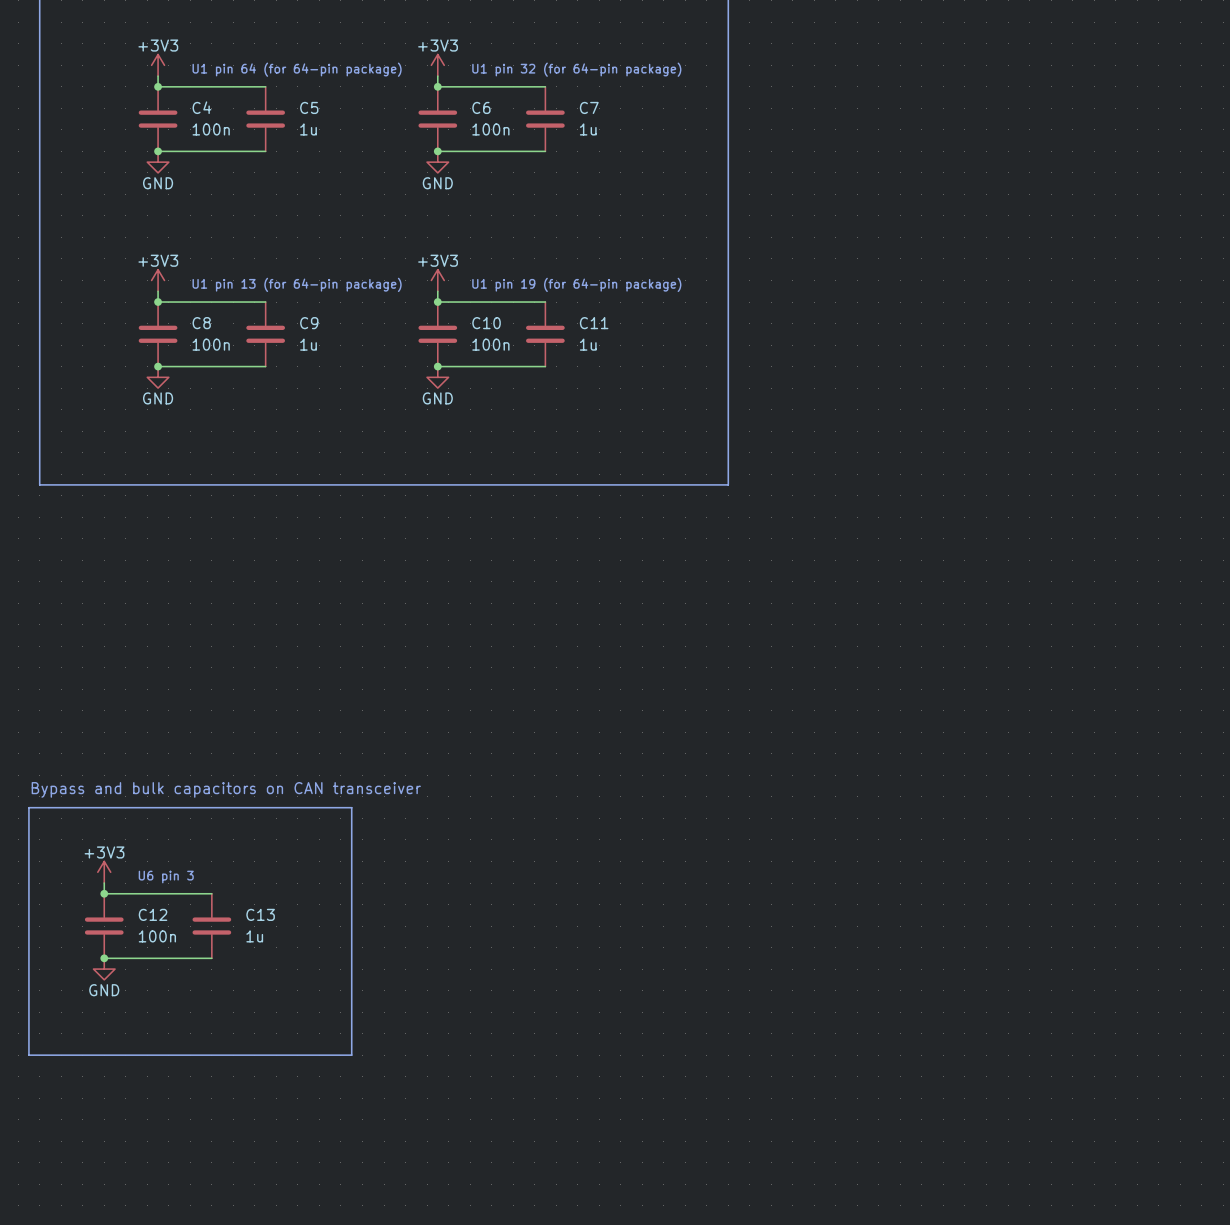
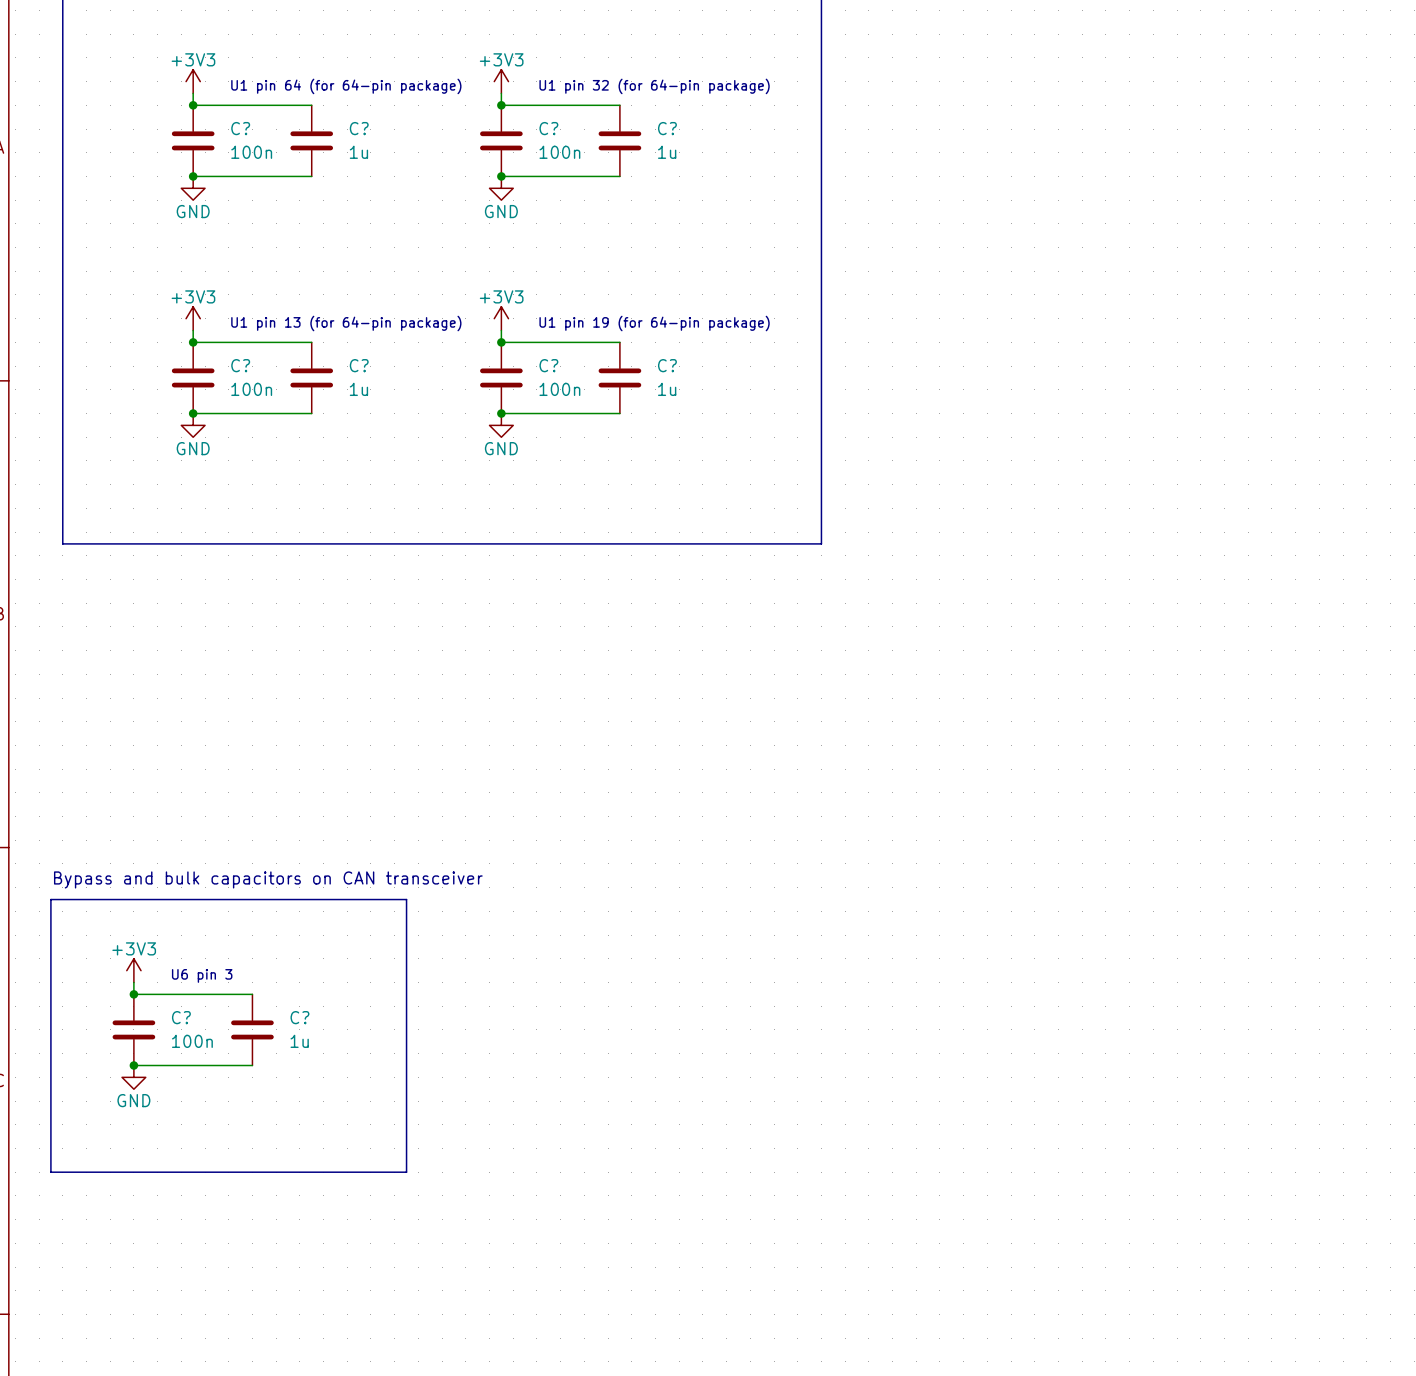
C4 name: C4 (201, 107) -> C? (240, 128)
C5 name: C5 (309, 107) -> C? (359, 128)
C6 name: C6 (481, 107) -> C? (548, 128)
C7 name: C7 (589, 107) -> C? (667, 128)
C8 name: C8 (201, 323) -> C? (240, 365)
C9 name: C9 (309, 323) -> C? (359, 365)
C10 name: C10 (486, 323) -> C? (548, 365)
C11 name: C11 (594, 323) -> C? (667, 365)
C12 name: C12 (153, 914) -> C? (181, 1017)
C13 name: C13 (260, 914) -> C? (299, 1017)

